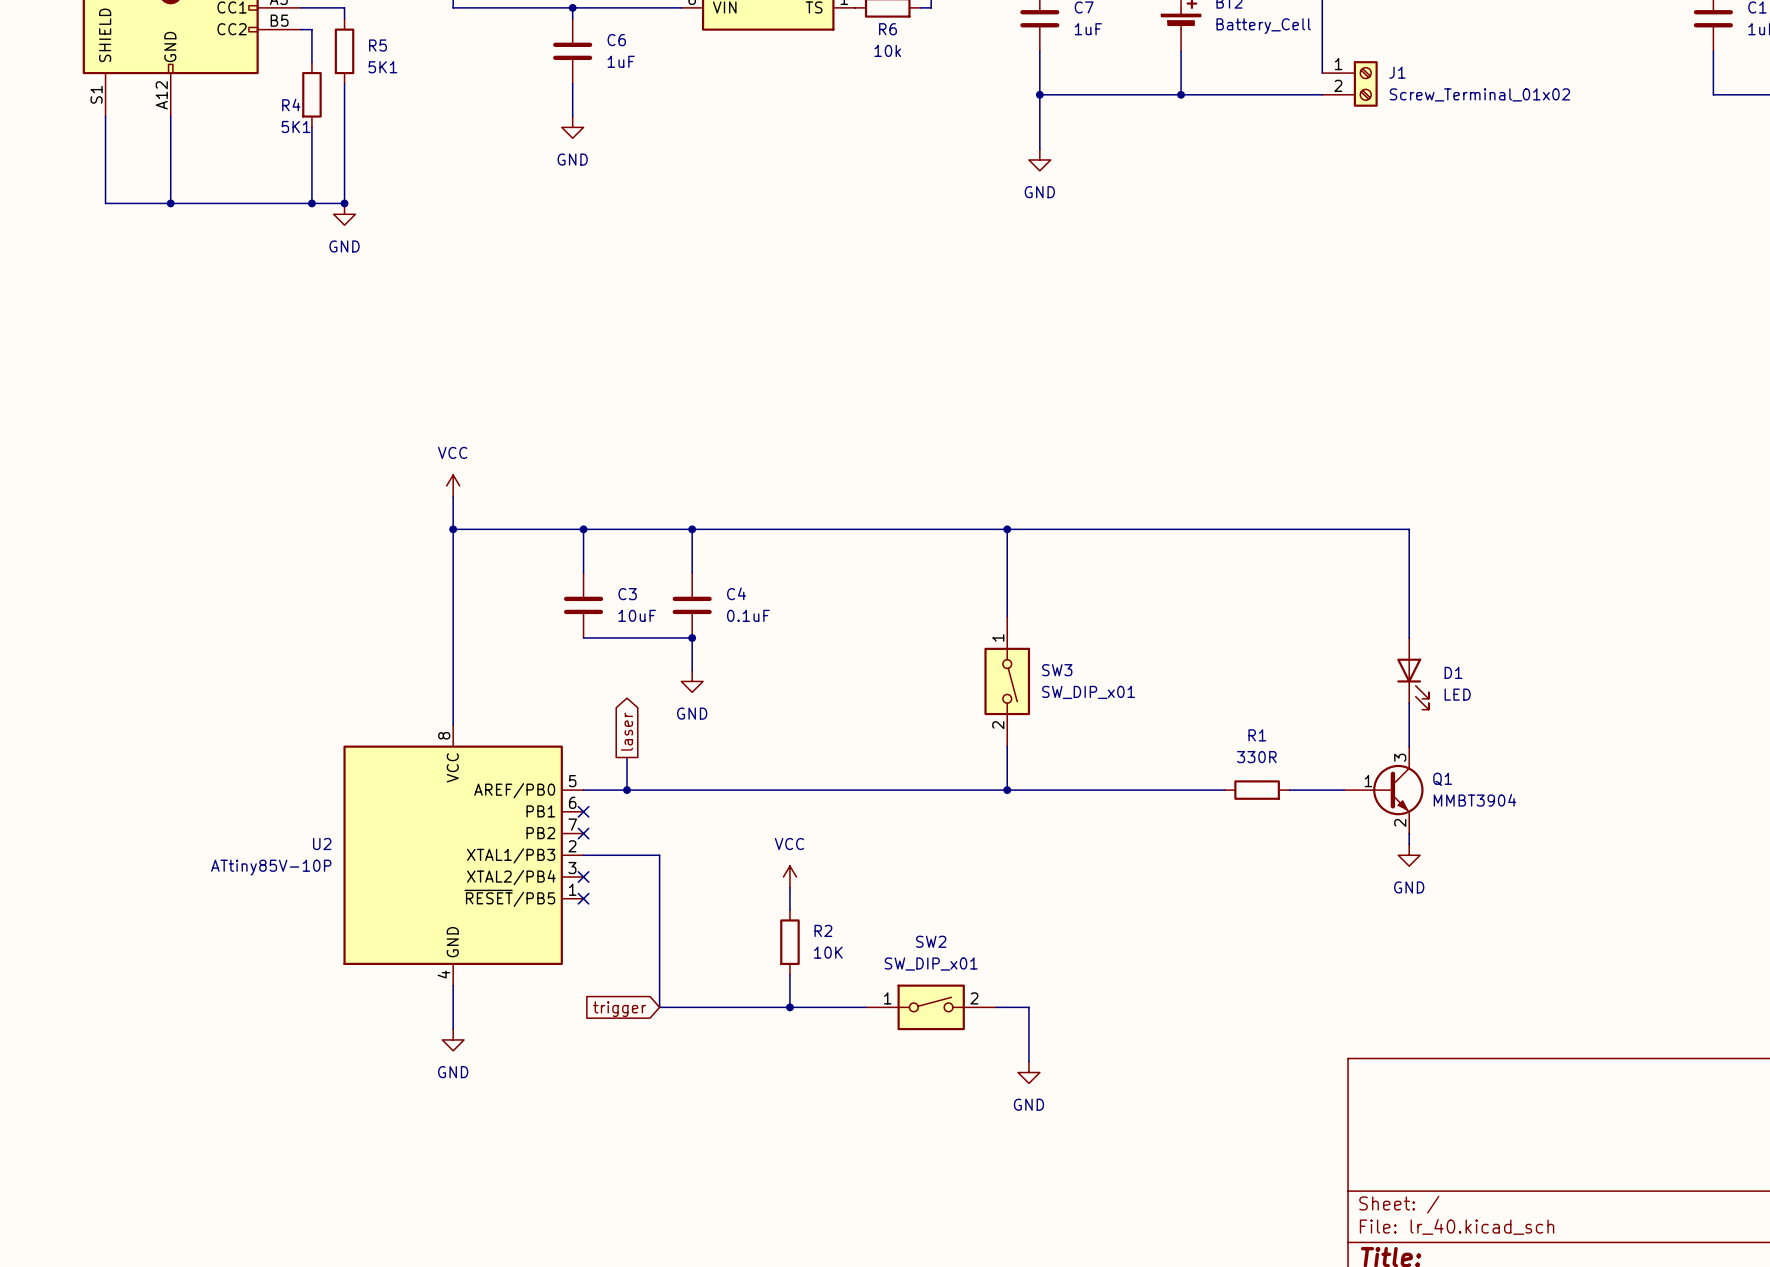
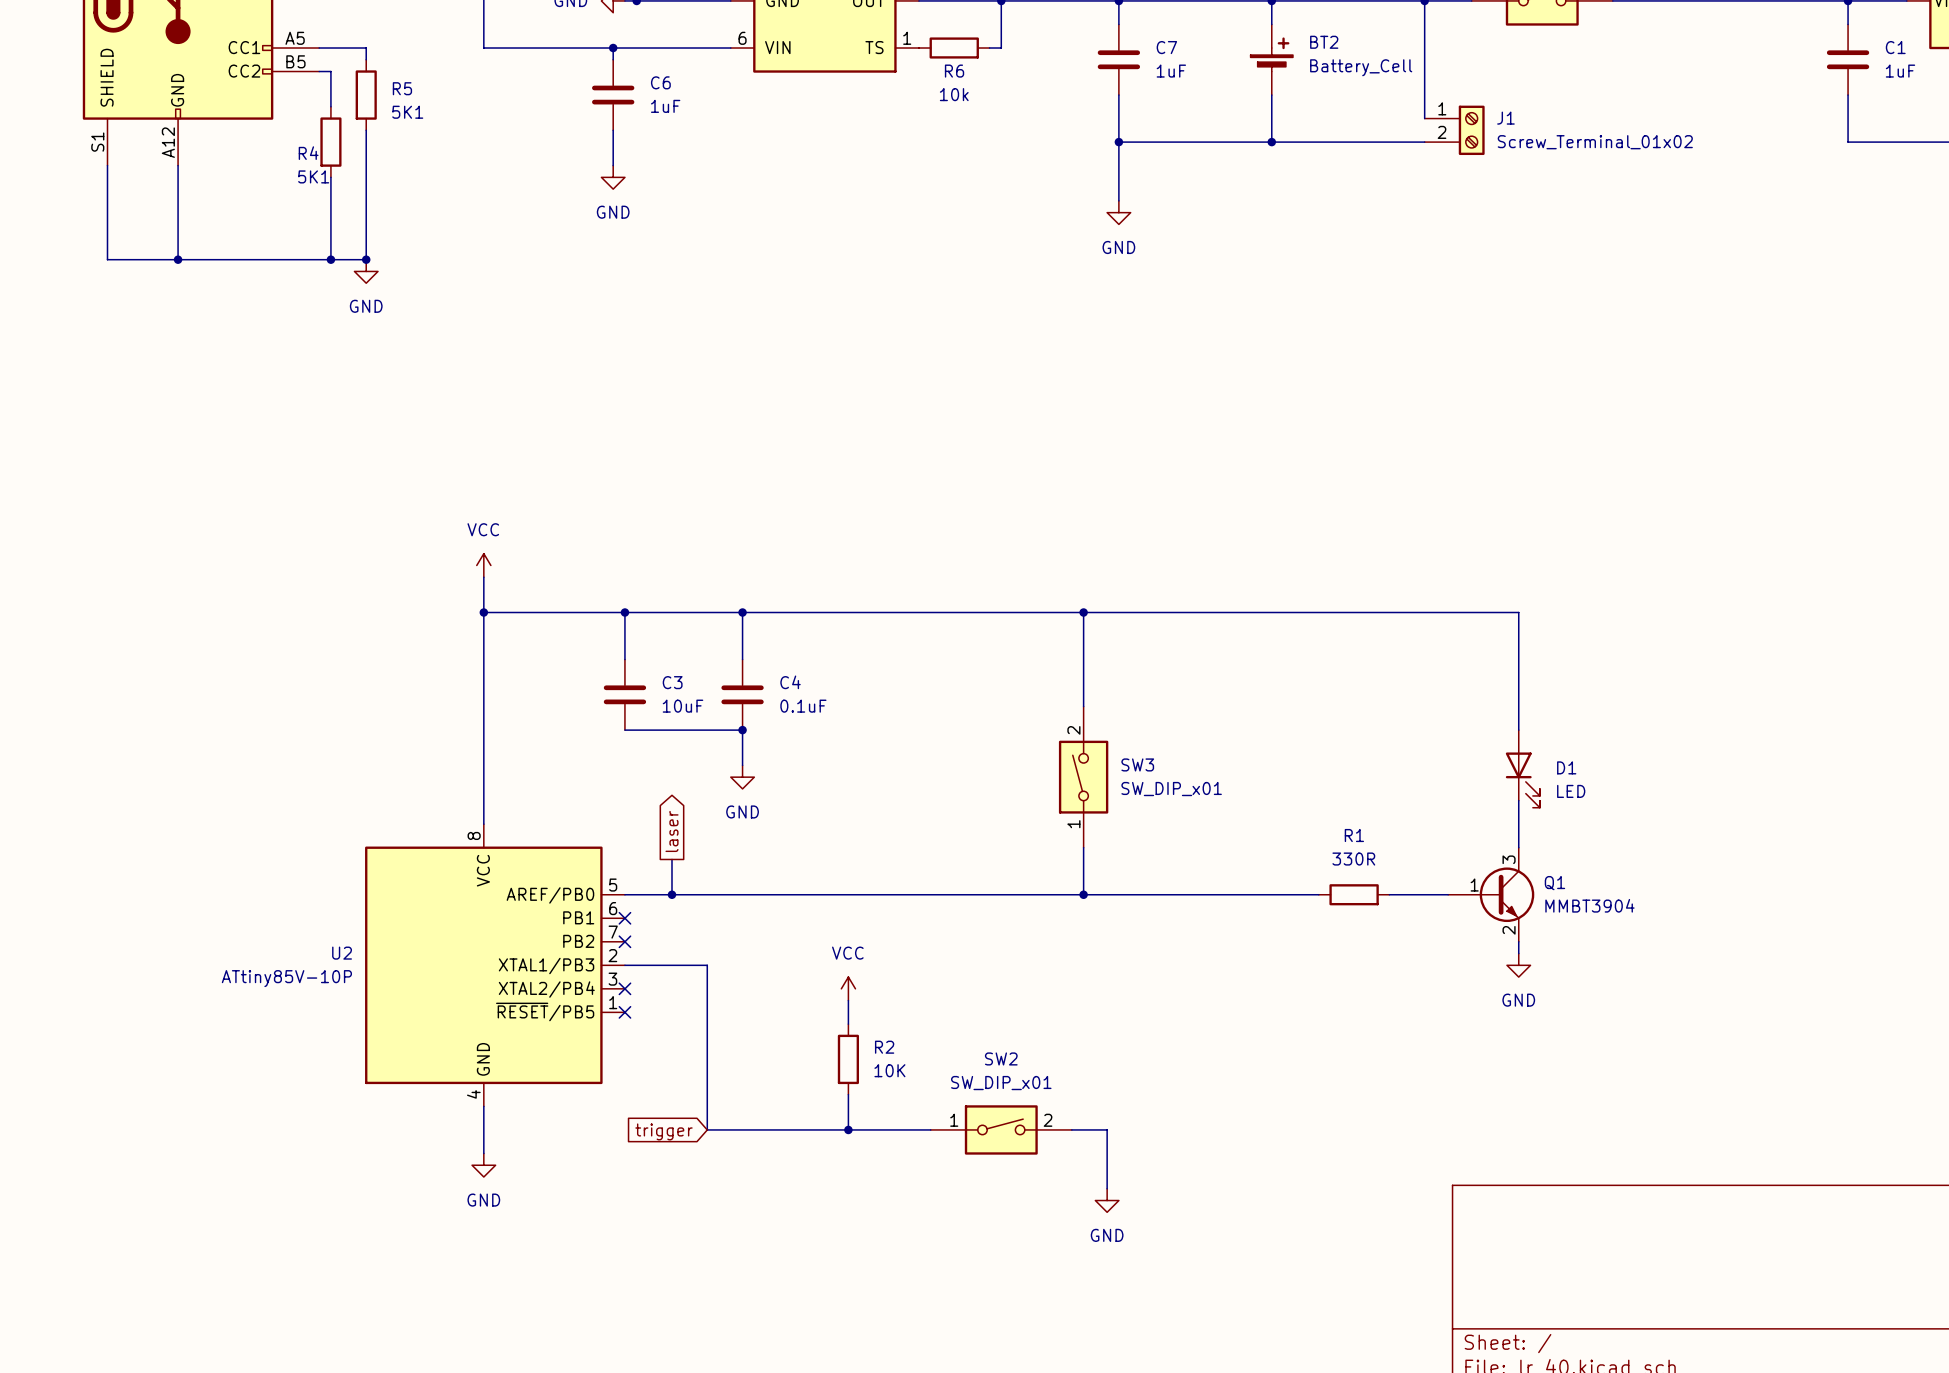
SW3 rotation: 0° (1007, 681) -> 180° (1083, 777)

